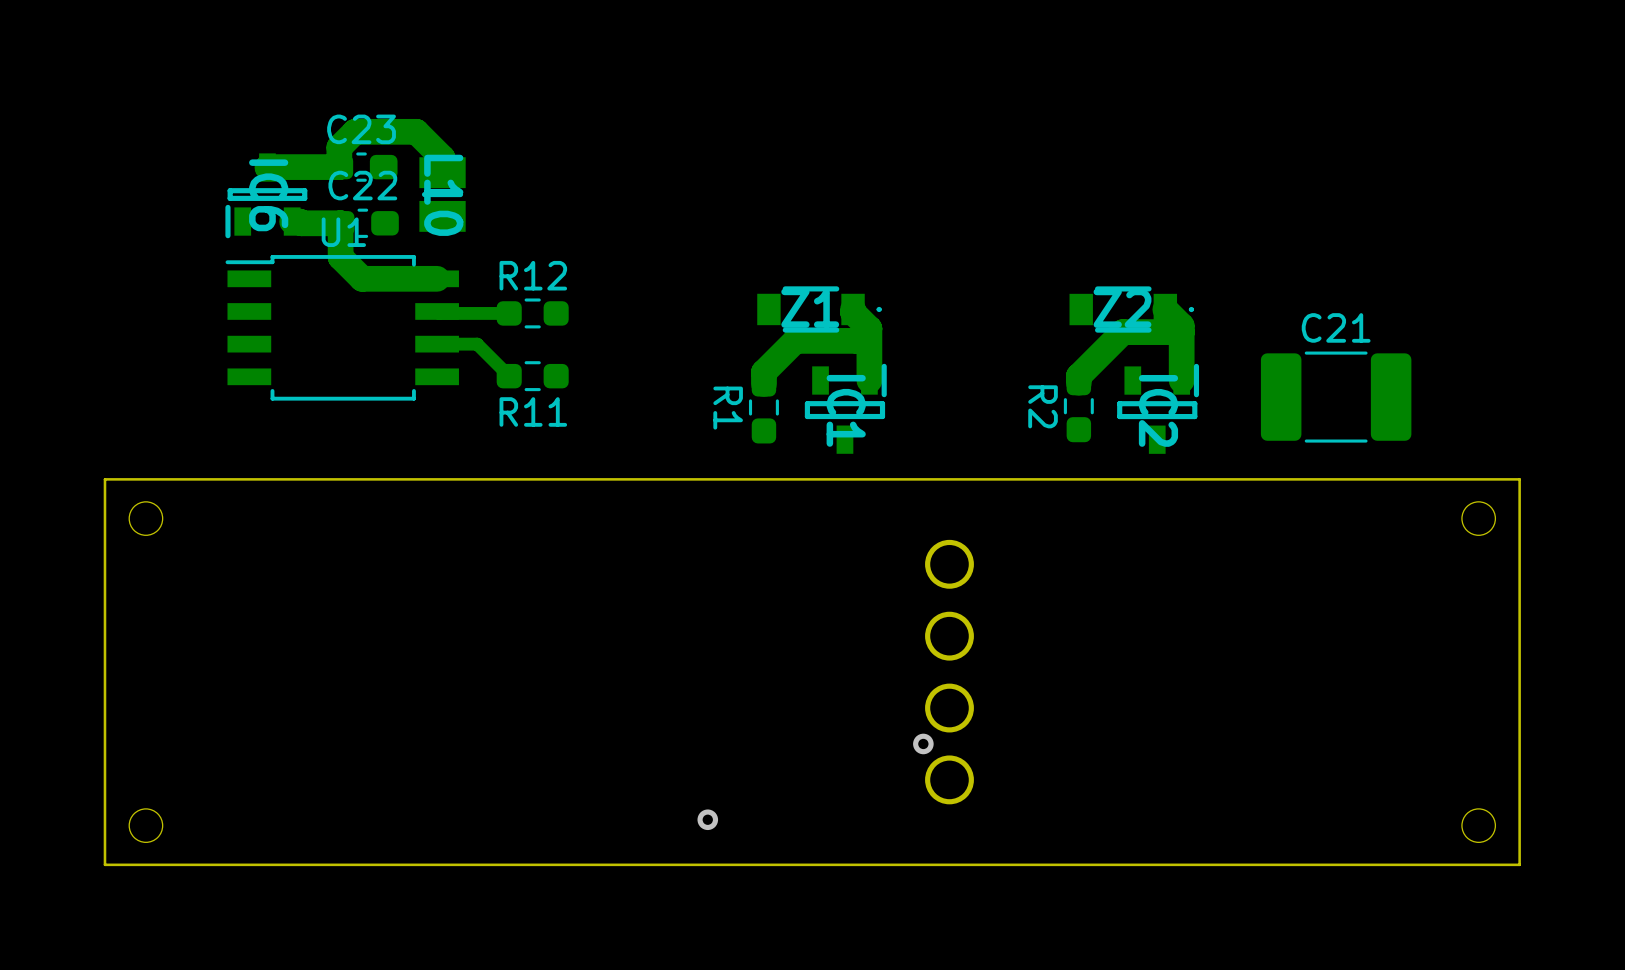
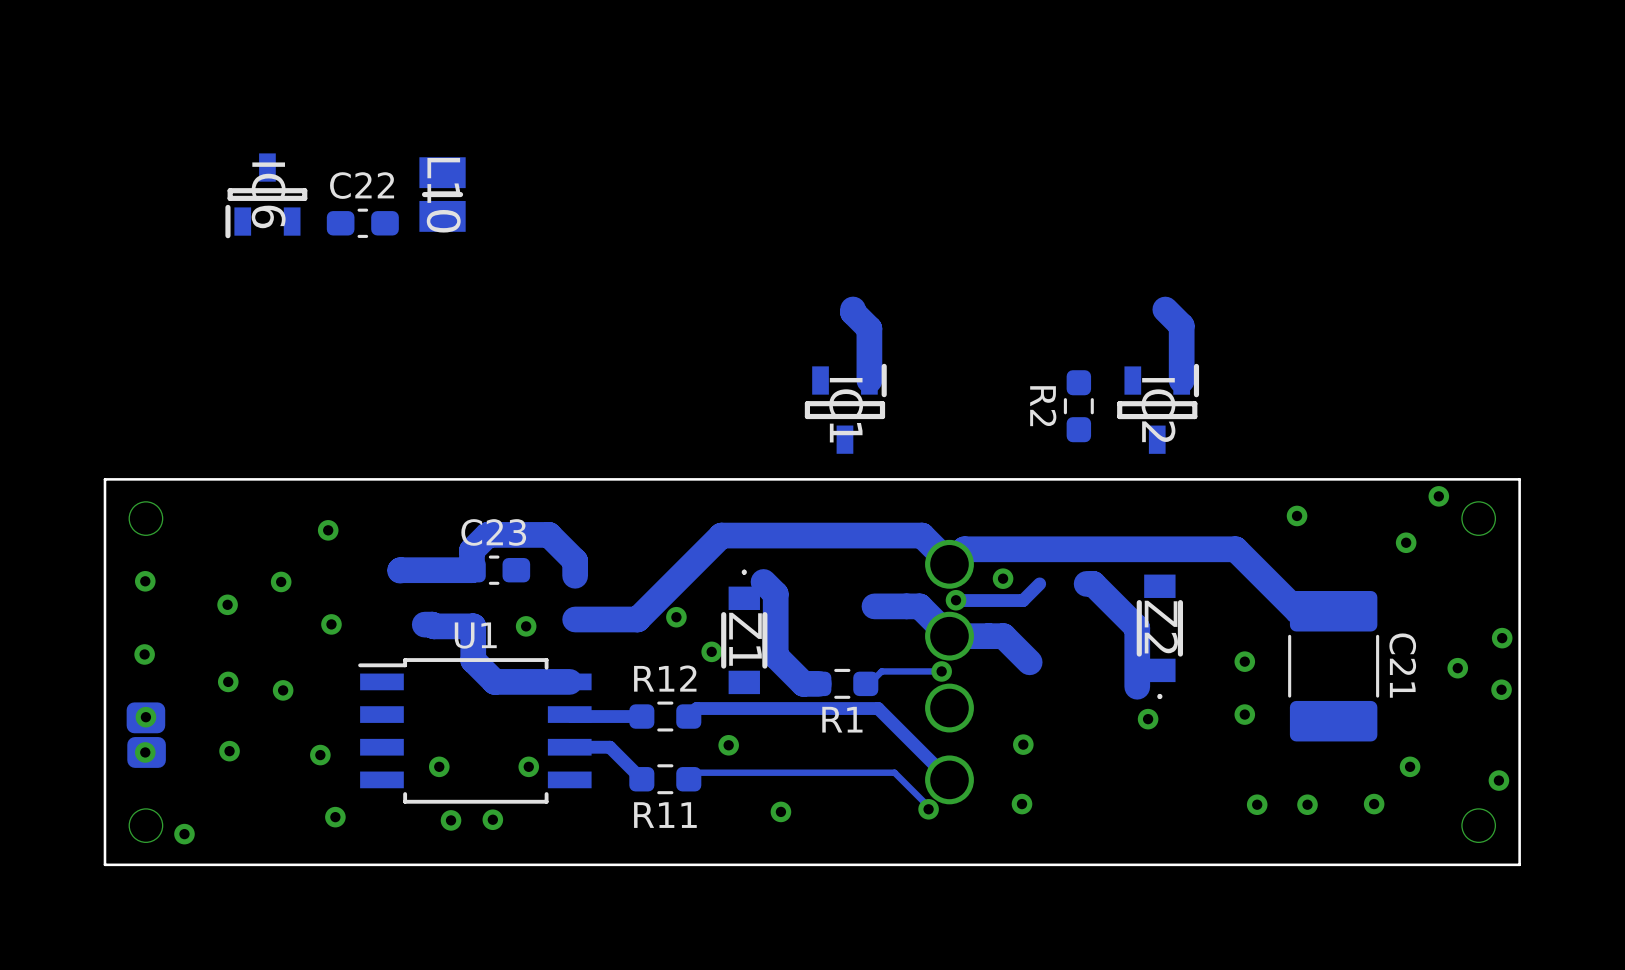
track: (267, 167) (339, 167) (339, 147) (354, 131) (416, 131) (442, 157) (442, 172) -> (400, 570) (471, 570) (471, 550) (487, 534) (549, 534) (575, 561) (575, 575)
C23 position: (361, 167) -> (494, 570)
track: (292, 221) (340, 223) (340, 257) (362, 278) (437, 278) -> (424, 624) (473, 626) (473, 660) (494, 681) (569, 681)
Z1 rotation: 0° (819, 309) -> 90° counterclockwise (744, 631)
Z1 position: (819, 309) -> (744, 631)
Z2 rotation: 0° (1131, 309) -> 90° clockwise (1159, 636)
Z2 position: (1131, 309) -> (1159, 636)
track: (437, 311) (439, 313) (509, 313) -> (569, 714) (571, 716) (641, 716)
R12 position: (532, 313) -> (665, 716)
U1 position: (342, 327) -> (474, 730)
track: (869, 328) (857, 340) (795, 340) (763, 372) (763, 384) -> none
track: (1181, 332) (1122, 332) (1078, 376) (1078, 382) -> none
track: (437, 344) (477, 344) (509, 376) -> (569, 747) (609, 747) (641, 779)
R11 position: (532, 376) -> (665, 779)
C21 rotation: 0° (1336, 397) -> 90° clockwise (1333, 666)
C21 position: (1336, 397) -> (1333, 666)
R1 rotation: 0° (763, 407) -> 90° clockwise (842, 683)
R1 position: (763, 407) -> (842, 683)
R1 name position: R1 (728, 408) -> R1 (842, 719)
via: none -> (1438, 496)
via: none -> (1297, 515)
via: none -> (328, 530)
via: none -> (1406, 542)
via: none -> (1003, 578)
via: none -> (145, 581)
via: none -> (281, 581)
track: none -> (763, 581) (775, 594) (775, 656) (803, 683) (818, 683)
track: none -> (1039, 583) (1023, 600) (956, 600)
track: none -> (1086, 583) (1093, 583) (1137, 627) (1137, 686)
via: none -> (956, 600)
via: none -> (227, 604)
track: none -> (874, 606) (919, 606) (949, 636) (1003, 636) (1029, 662)
track: none -> (1333, 611) (1297, 611) (1235, 549) (964, 549) (949, 564) (922, 535) (721, 535) (637, 619) (575, 619)
via: none -> (676, 617)
via: none -> (331, 624)
via: none -> (526, 626)
via: none -> (1502, 638)
via: none -> (711, 651)
via: none -> (144, 654)
via: none -> (1244, 661)
via: none -> (1457, 668)
track: none -> (941, 671) (881, 671) (865, 687)
via: none -> (941, 671)
via: none -> (228, 681)
via: none -> (1501, 689)
via: none -> (283, 690)
via: none -> (1244, 714)
track: none -> (688, 716) (696, 708) (878, 708) (949, 779)
part: none -> (145, 717)
via: none -> (145, 717)
via: none -> (1148, 719)
via: (923, 743) -> none
via: none -> (1023, 744)
via: none -> (728, 745)
via: none -> (229, 751)
via: none -> (145, 752)
part: none -> (146, 752)
via: none -> (320, 755)
via: none -> (439, 766)
via: none -> (528, 766)
via: none -> (1410, 766)
track: none -> (688, 779) (695, 772) (894, 772) (928, 806) (928, 809)
via: none -> (1498, 780)
via: none -> (1022, 804)
via: none -> (1257, 804)
via: none -> (1307, 804)
via: none -> (1374, 804)
via: none -> (928, 809)
via: none -> (780, 811)
via: none -> (335, 817)
via: none -> (492, 819)
via: (707, 819) -> none
via: none -> (451, 820)
via: none -> (184, 834)

